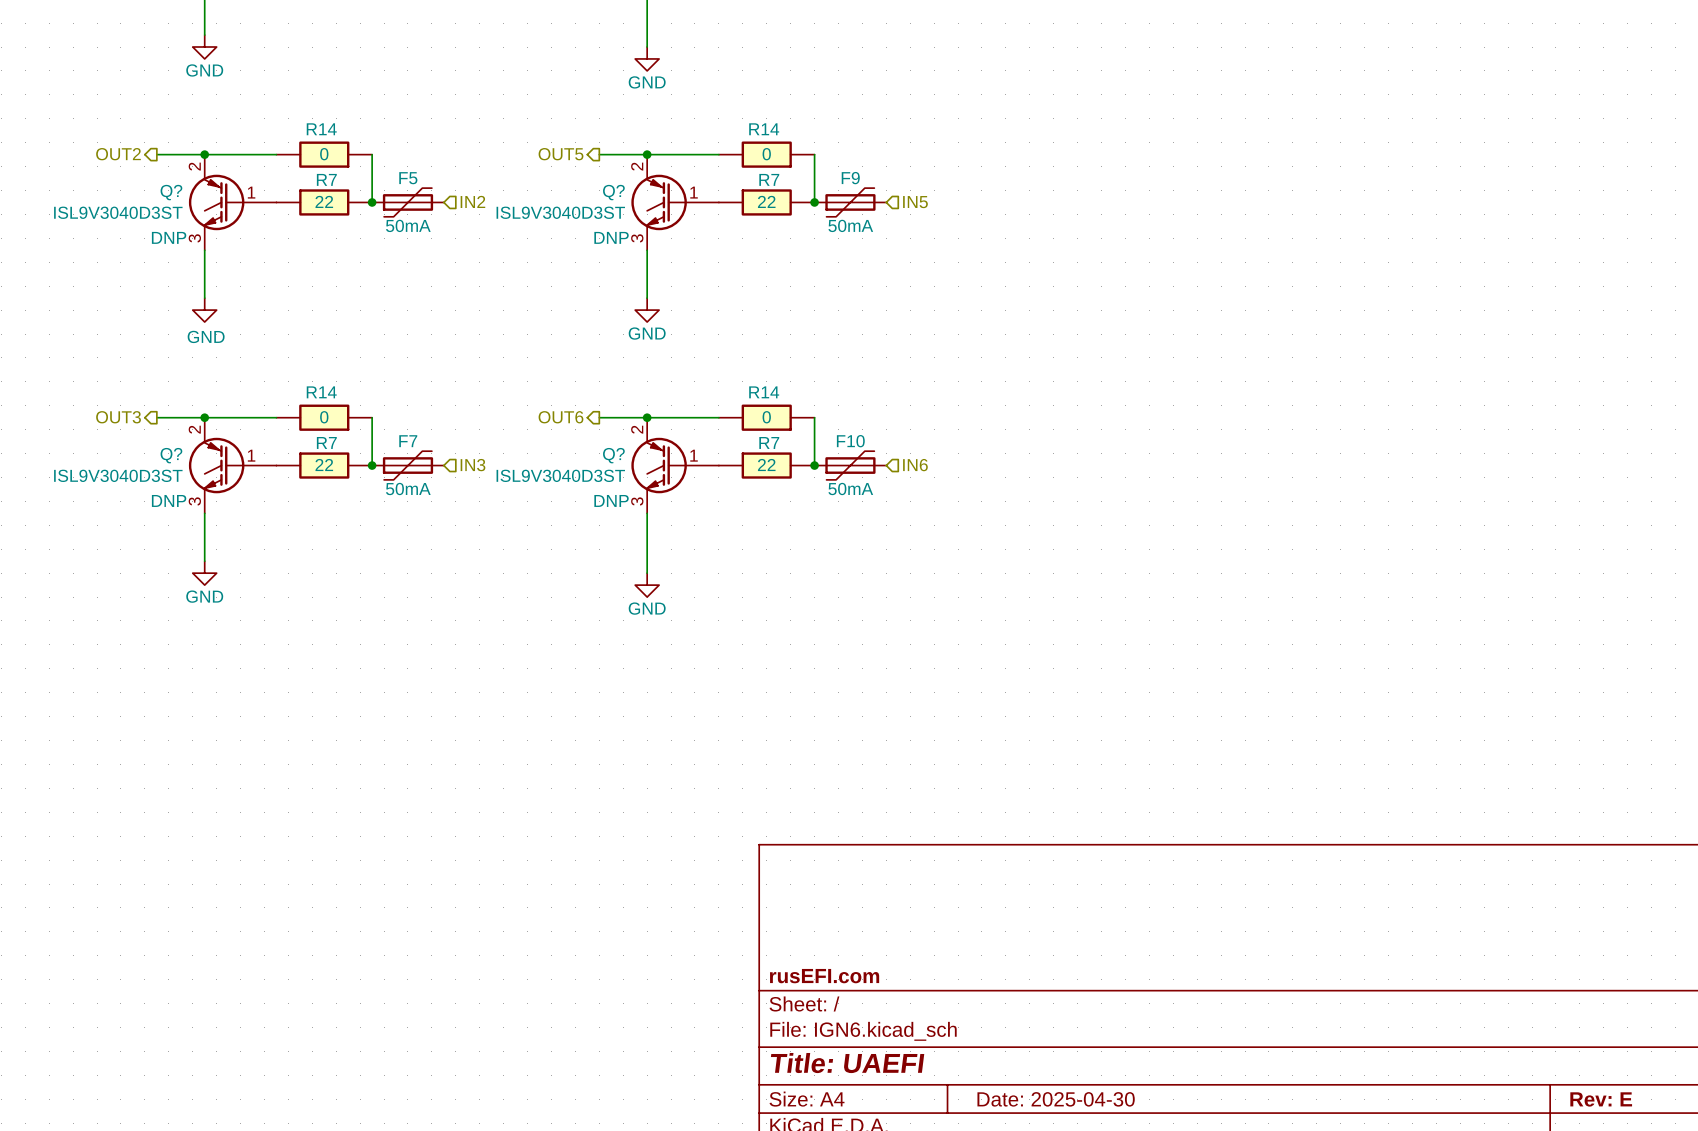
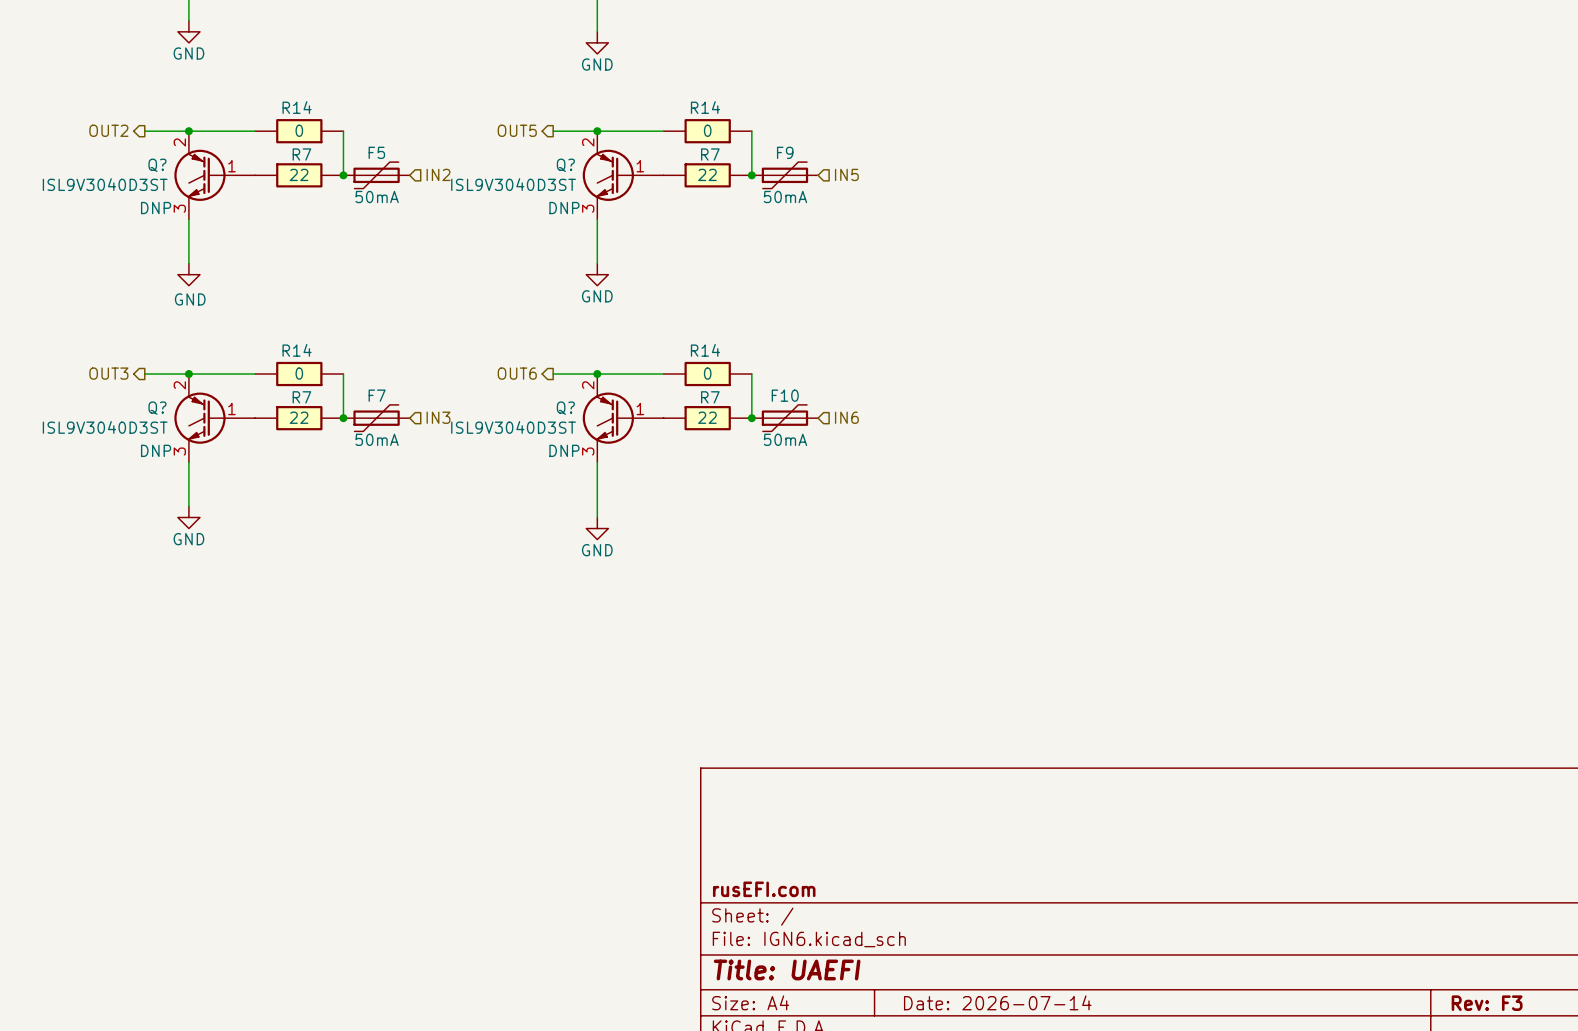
title block: Date: 2025-04-30 (1056, 1099) -> Date: 2026-07-14 (997, 1002)
title block: Rev: E (1601, 1099) -> Rev: F3 (1487, 1003)

